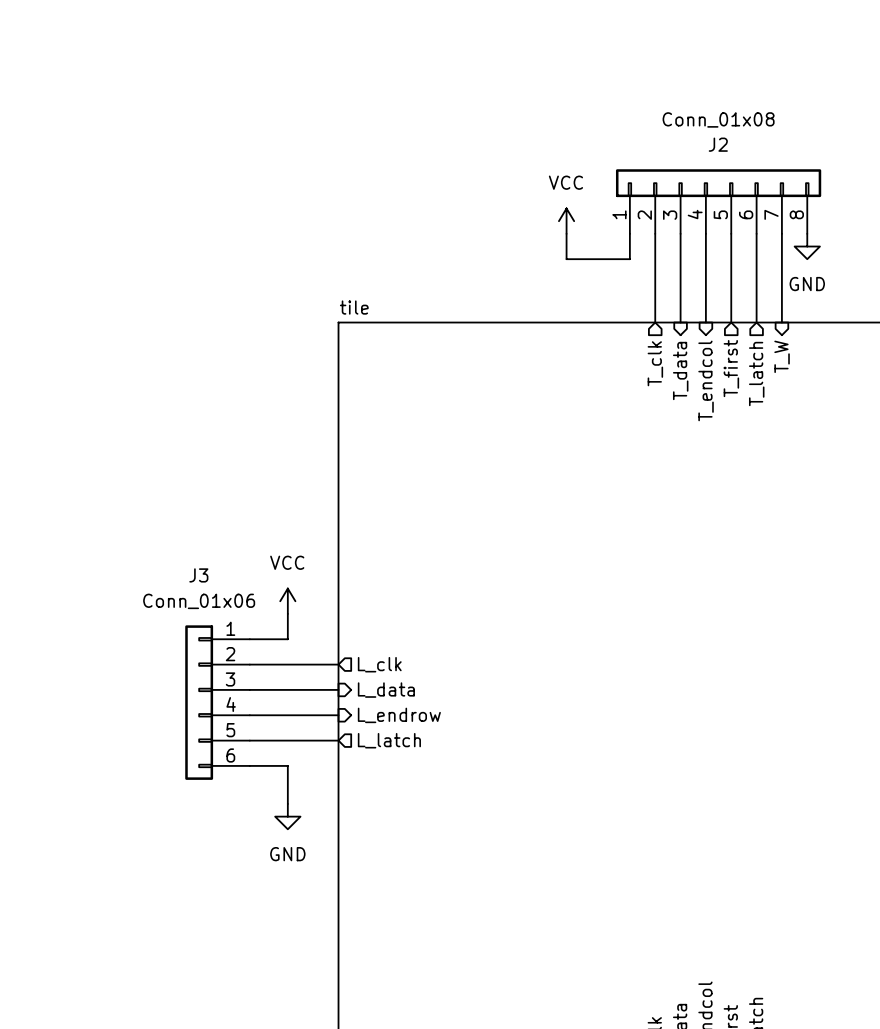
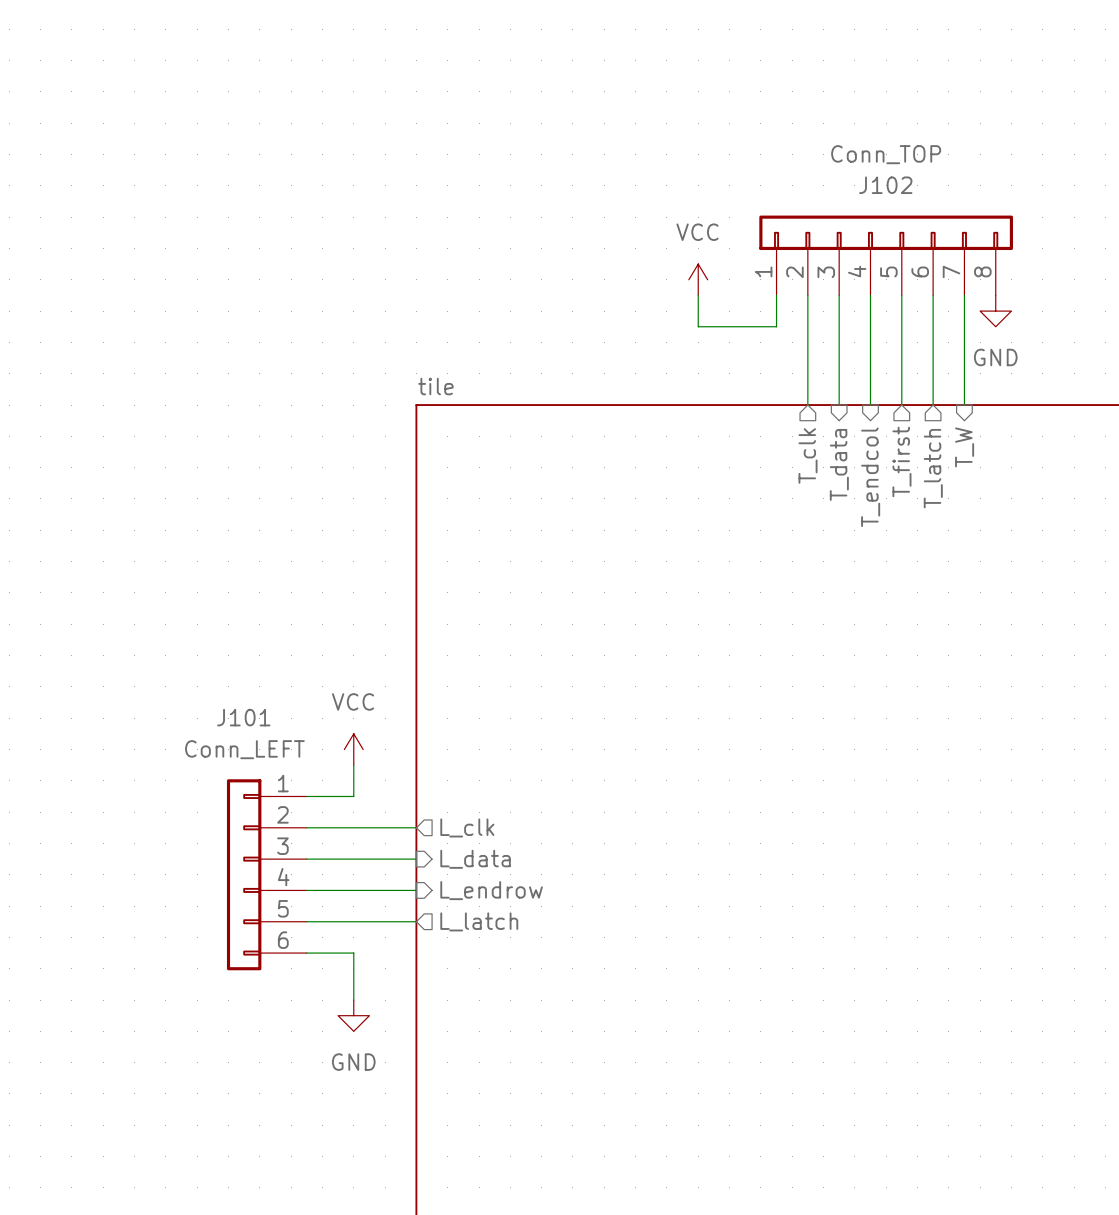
J2 value: Conn_01x08 (718, 119) -> Conn_TOP (886, 154)
J2 name: J2 (718, 144) -> J102 (885, 185)
J3 name: J3 (198, 575) -> J101 (243, 717)
J3 value: Conn_01x06 (199, 601) -> Conn_LEFT (244, 749)

